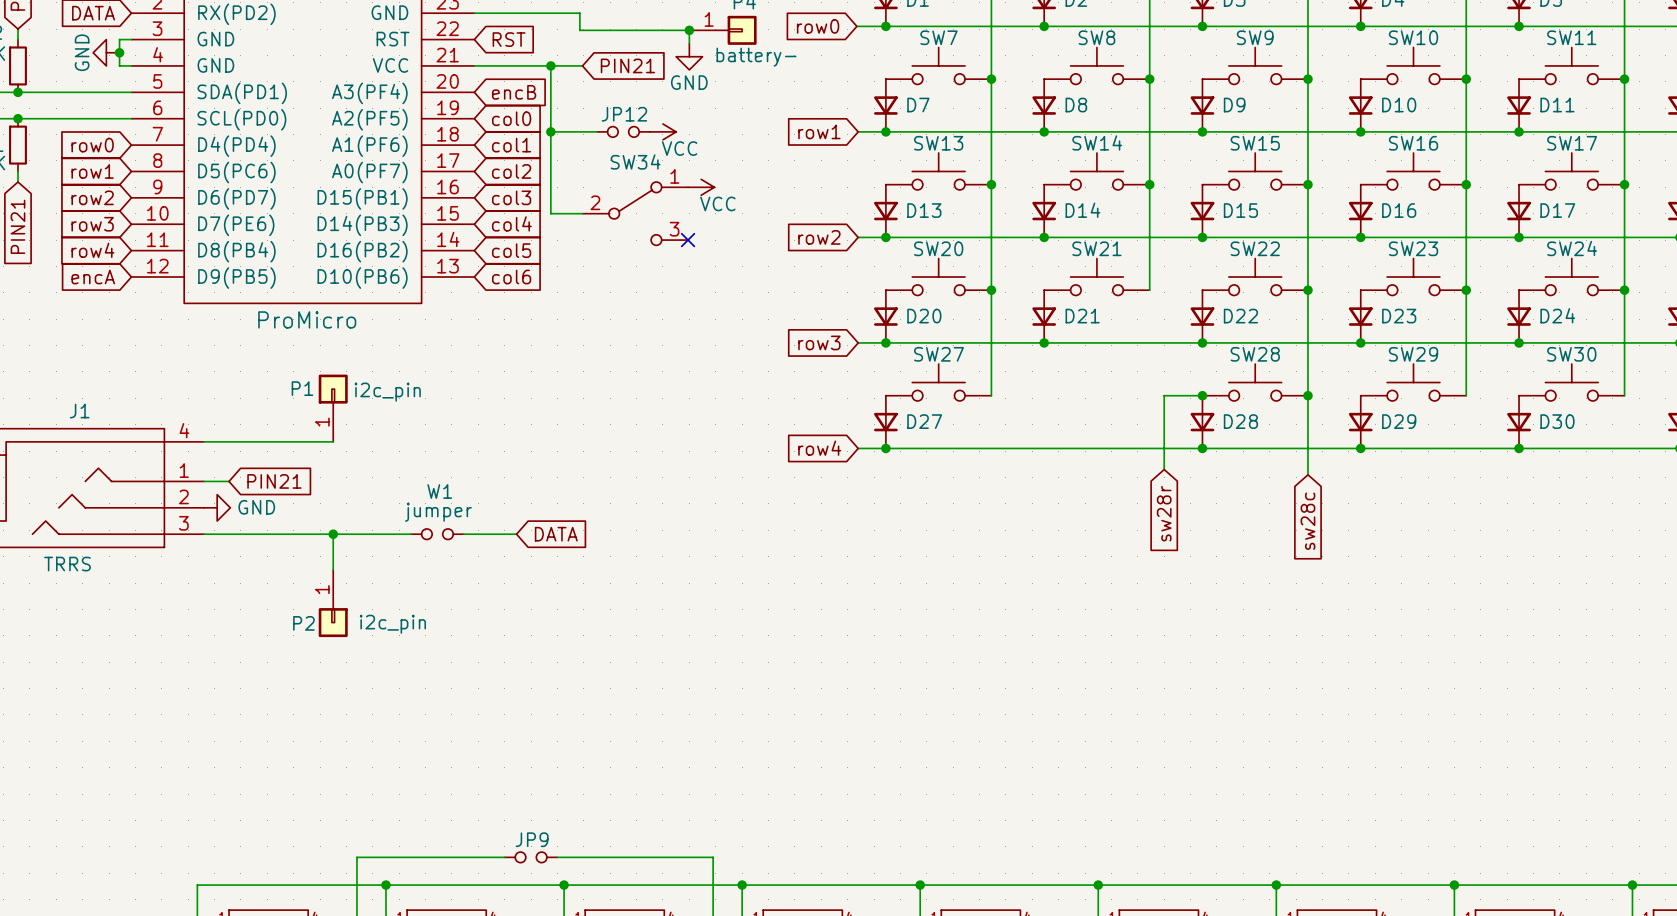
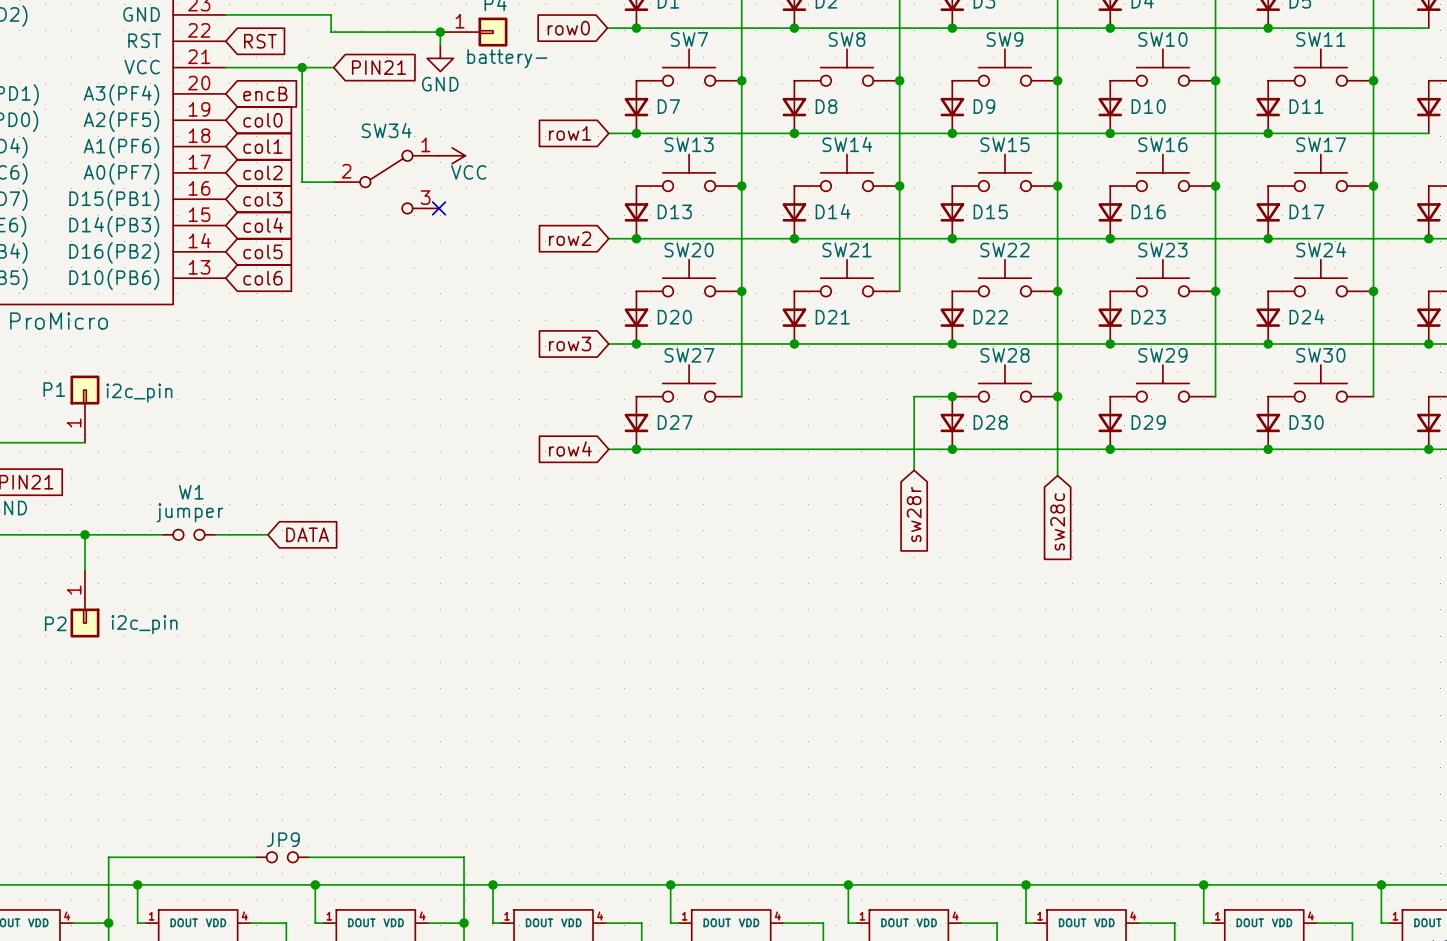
wire: (550, 131) (597, 131) -> none
junction: (550, 131) -> none
JP12: (623, 131) -> none
power symbol: VCC (662, 131) -> none
power symbol: none -> VCC (452, 155)
wire: (550, 180) (550, 213) (582, 213) -> (302, 182) (333, 182)
power symbol: VCC (701, 187) -> none
SW34 position: (635, 213) -> (386, 182)
no-connect mark position: (688, 240) -> (439, 208)

